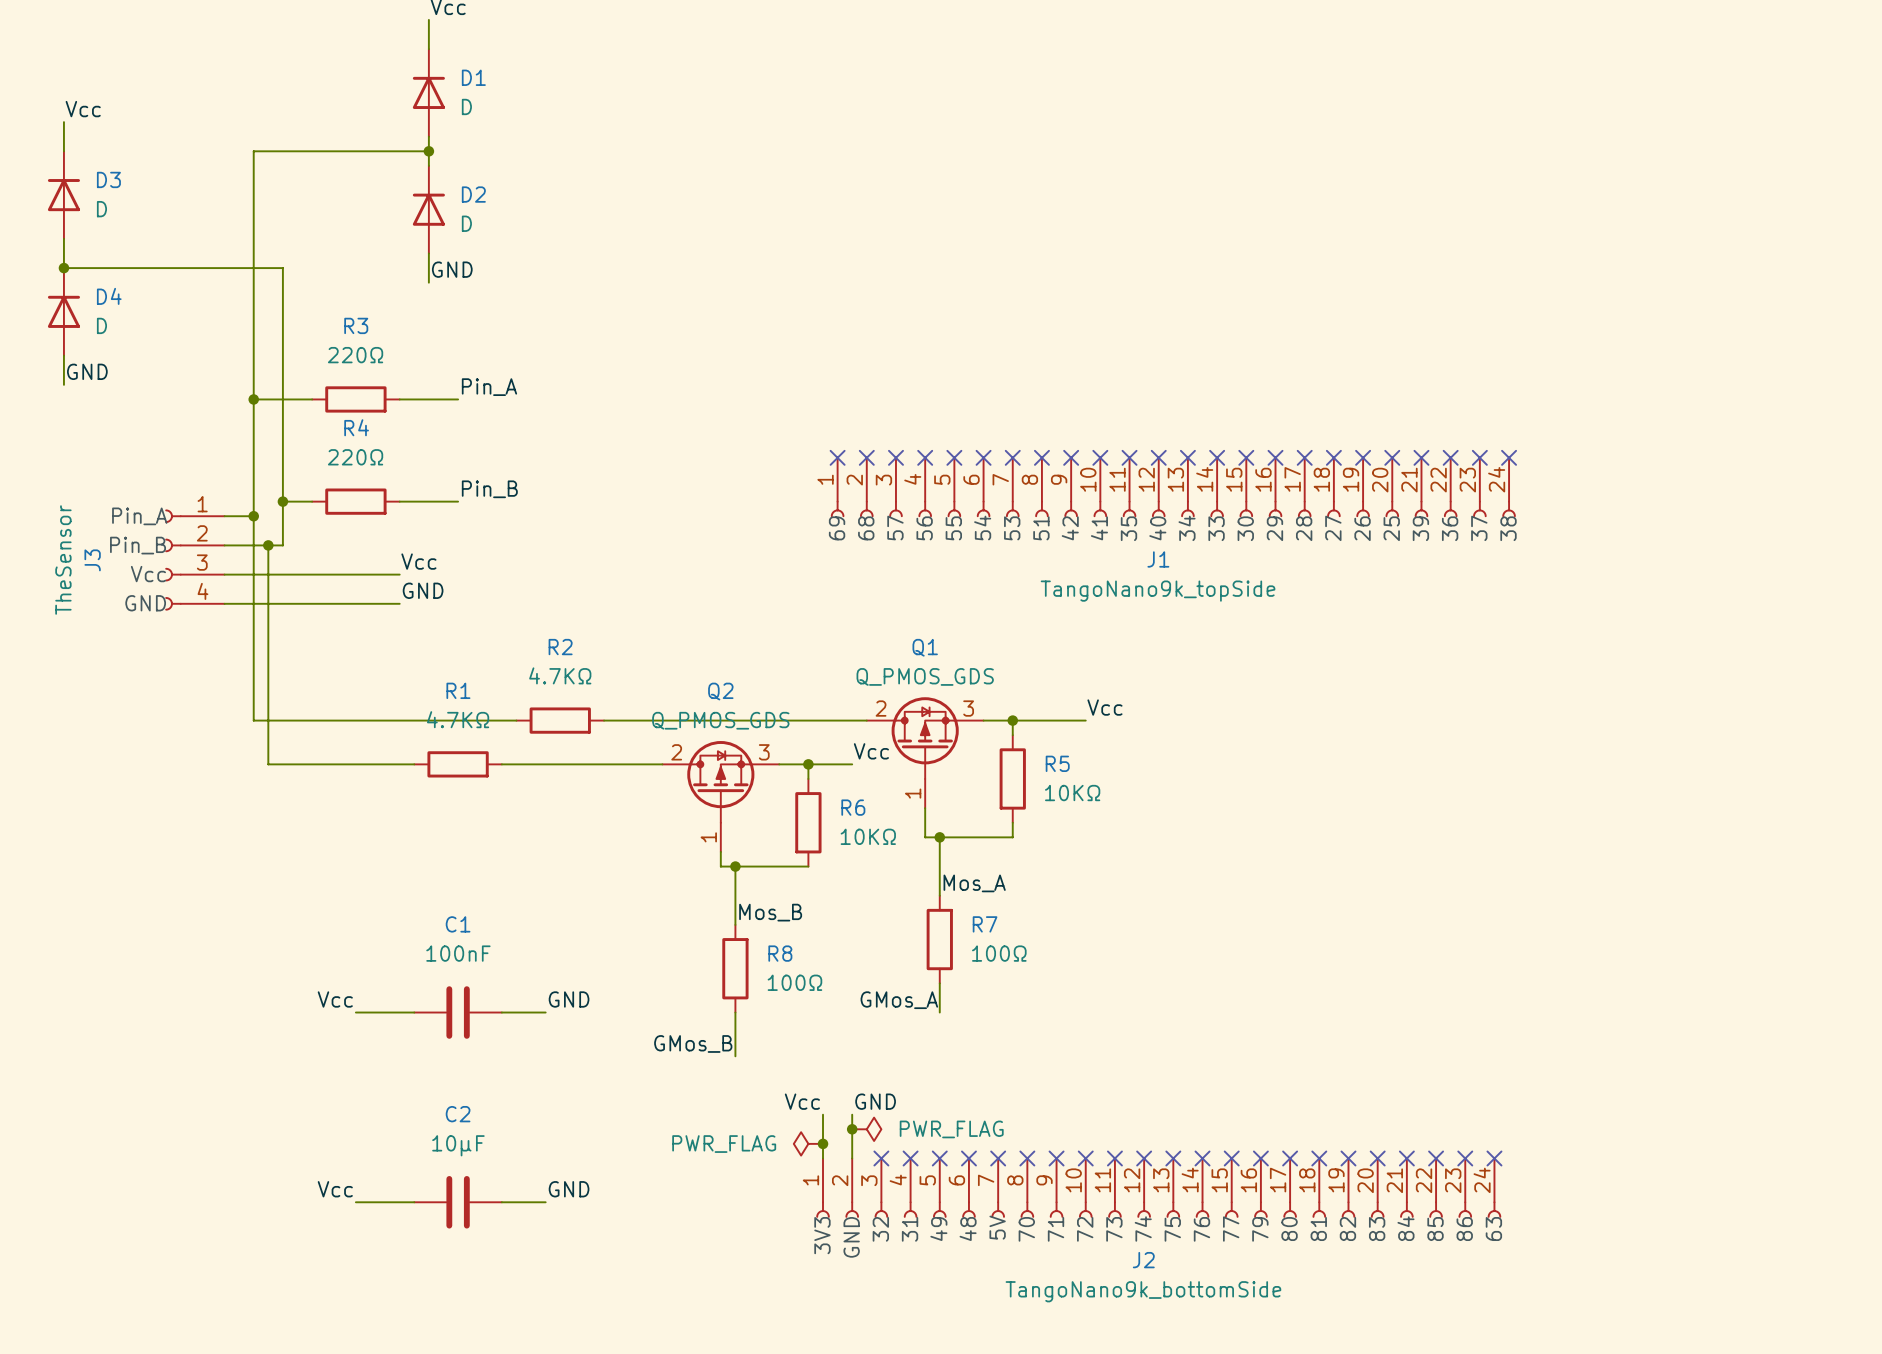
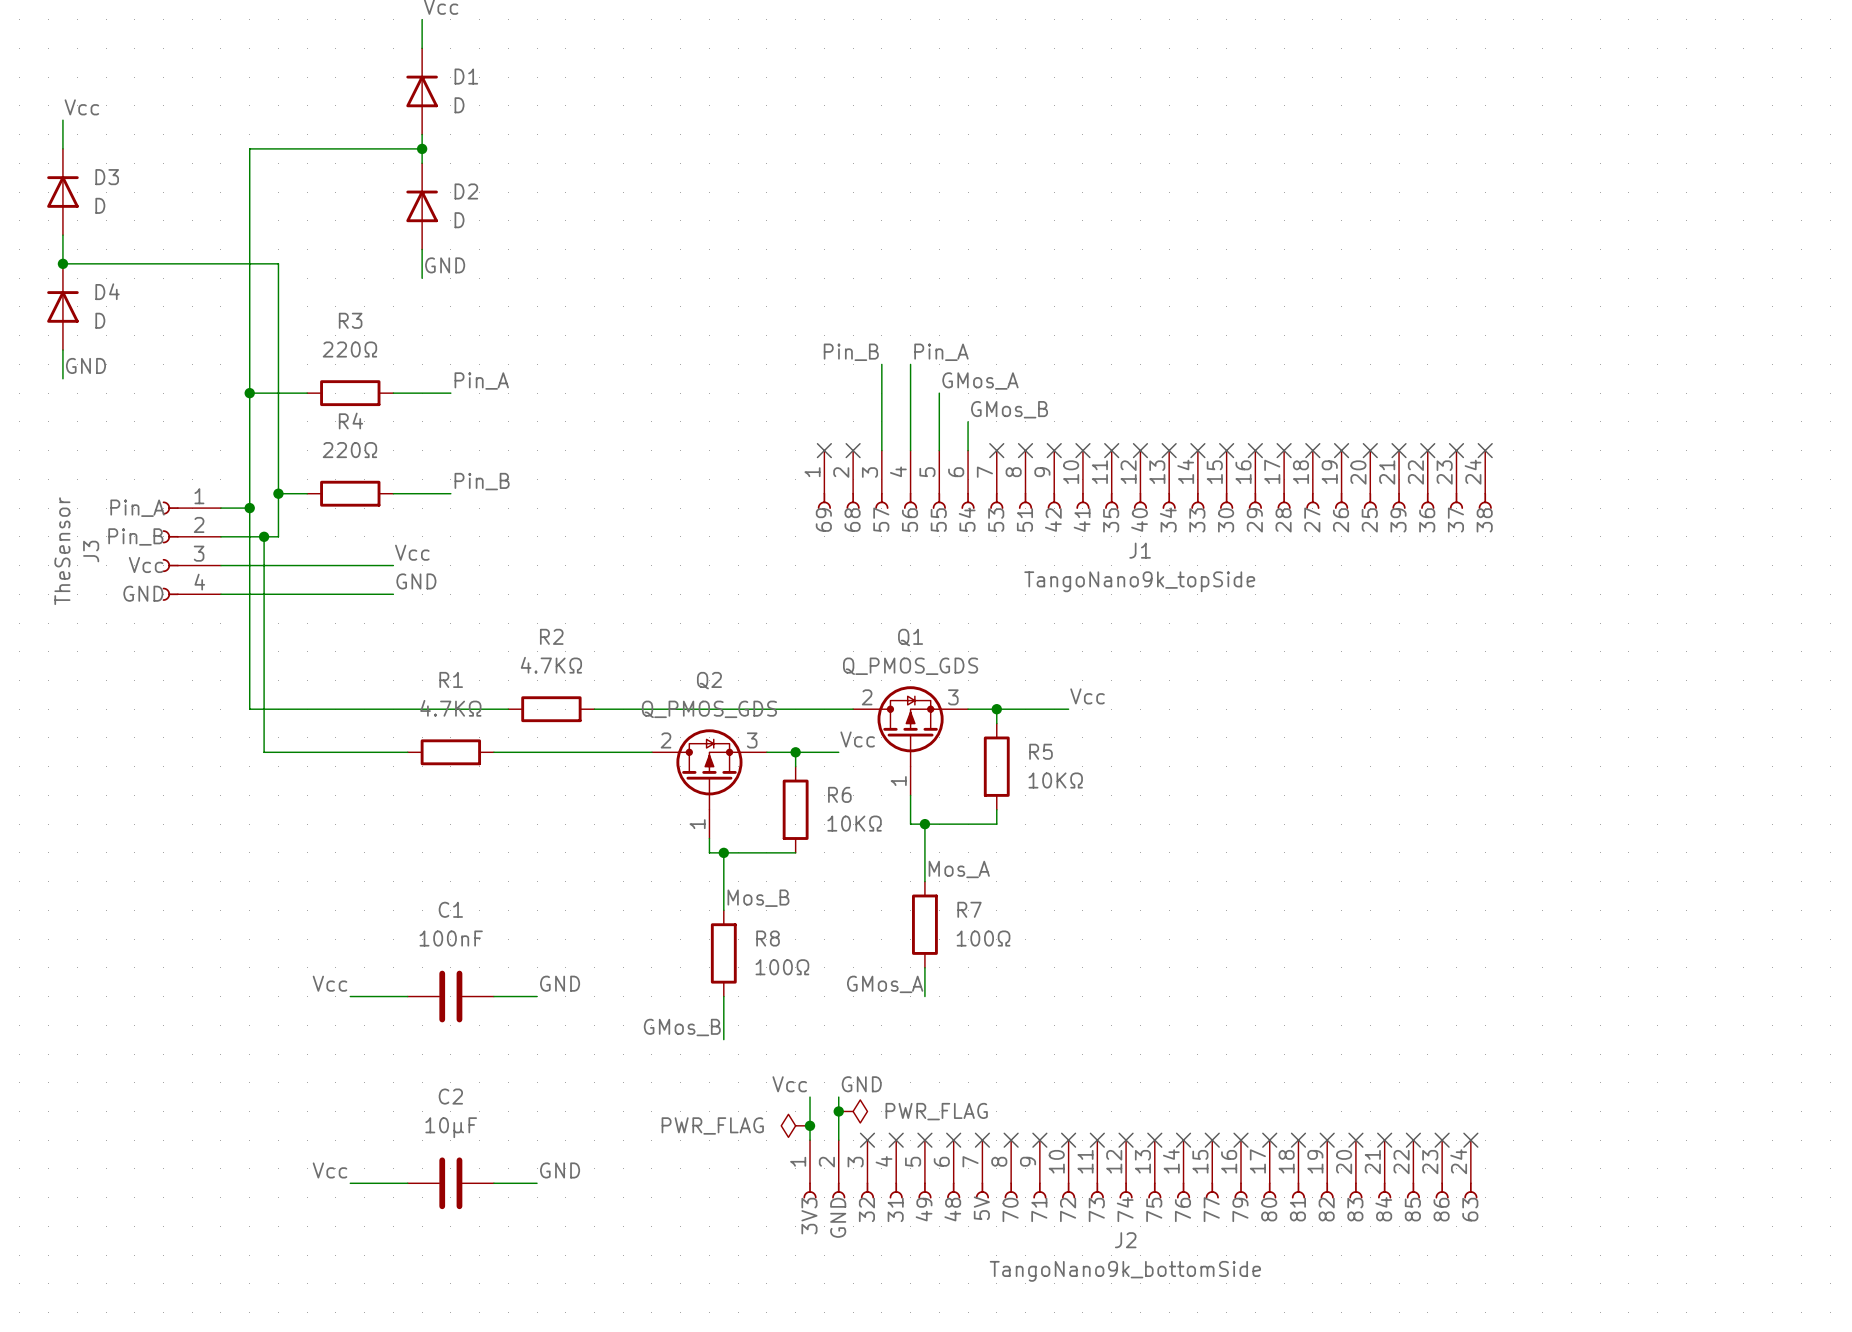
label: none -> Pin_B (851, 352)
label: none -> Pin_A (941, 352)
wire: none -> (881, 364) (881, 450)
wire: none -> (910, 364) (910, 450)
label: none -> GMos_A (980, 381)
wire: none -> (939, 393) (939, 450)
label: none -> GMos_B (1009, 409)
wire: none -> (968, 421) (968, 450)
no-connect mark: (895, 457) -> none
no-connect mark: (925, 457) -> none
no-connect mark: (954, 457) -> none
no-connect mark: (983, 457) -> none

